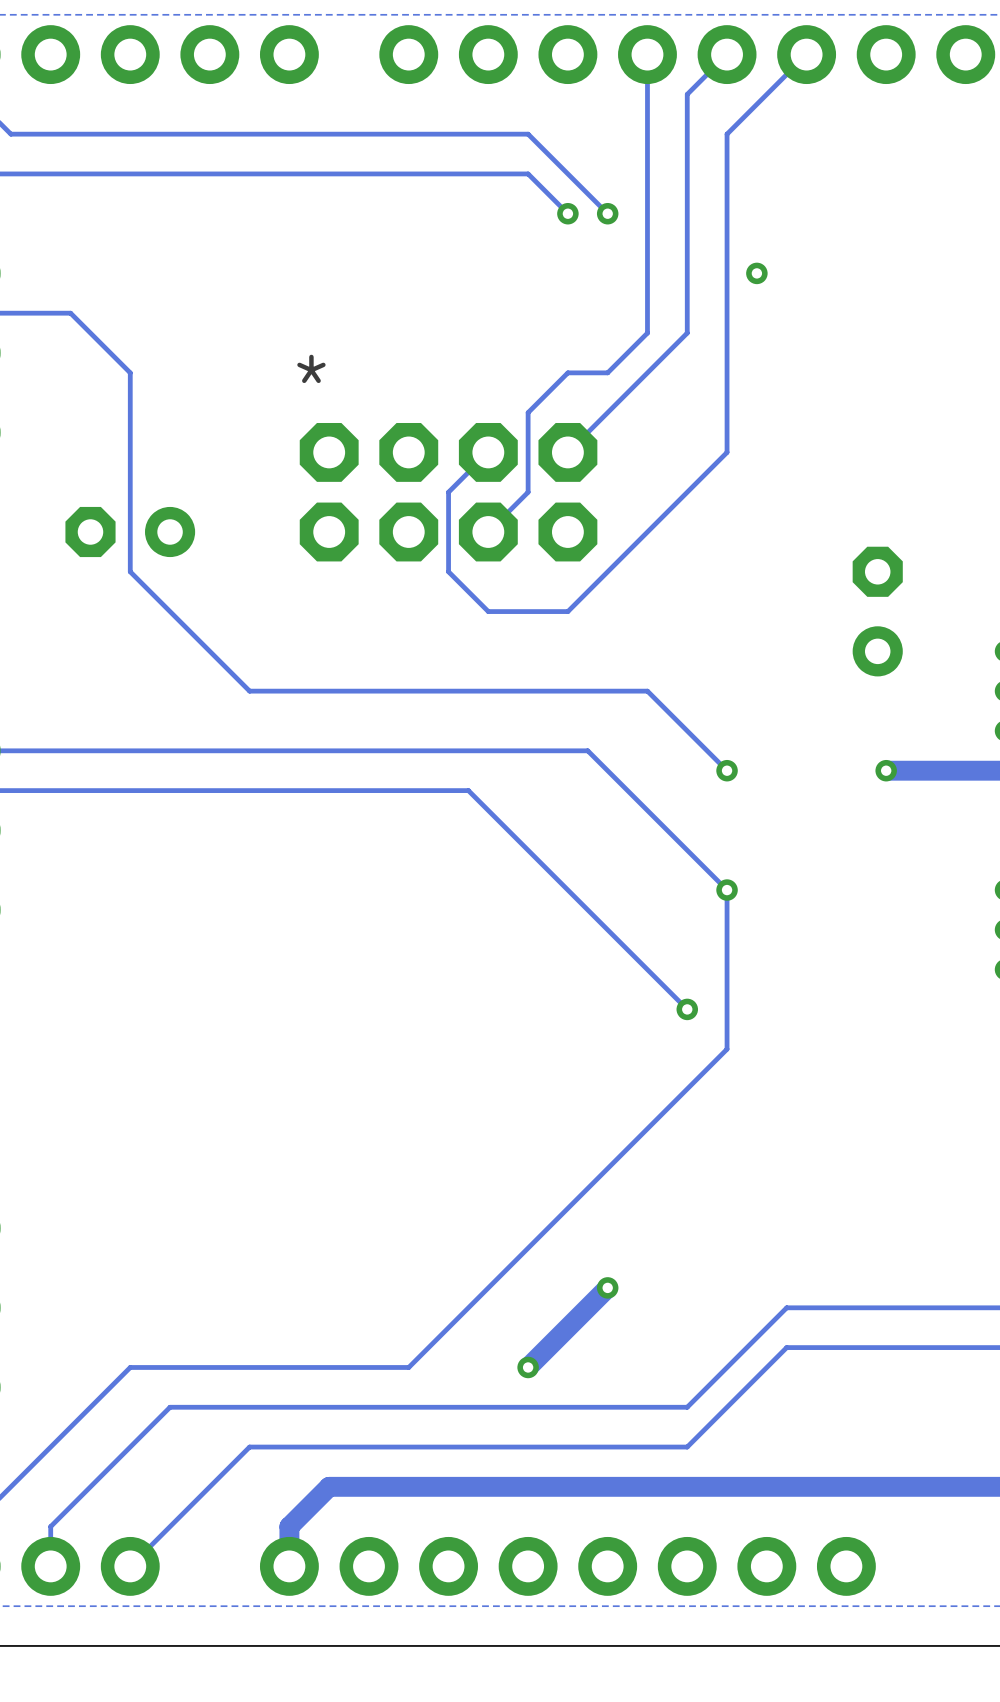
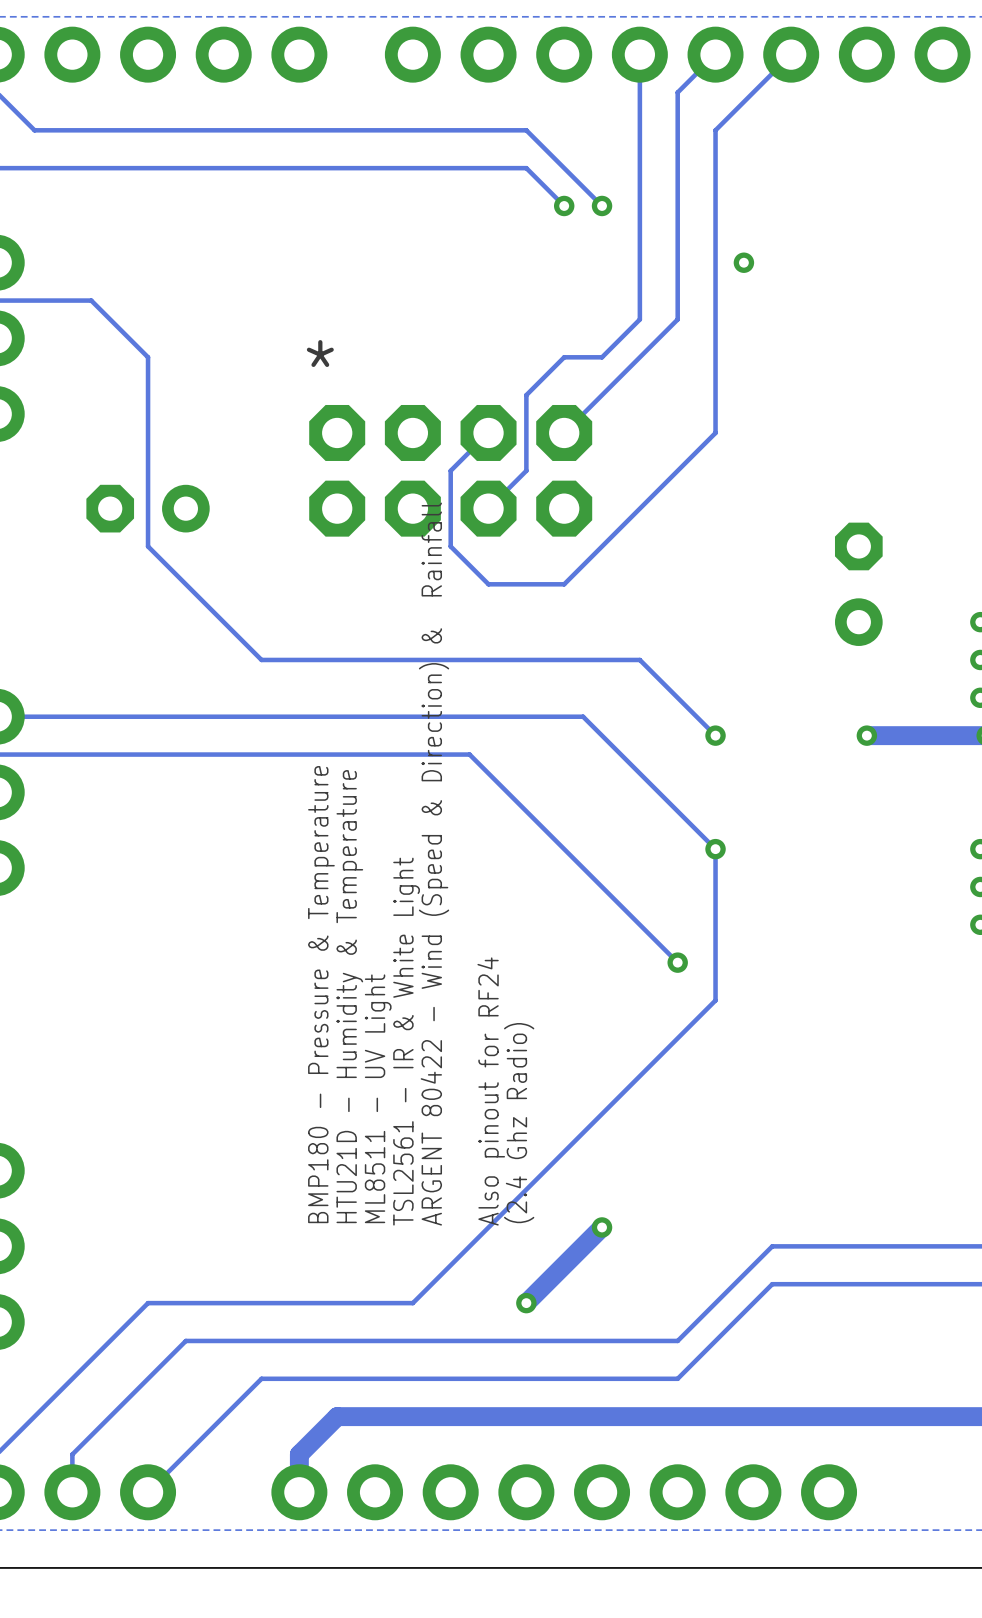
text: none -> ARGENT 80422 - Wind (Speed & Direction) & Rainfall (434, 864)
text: none -> BMP180 - Pressure & Temperature (321, 994)
text: none -> HTU21D - Humidity & Temperature (349, 996)
text: none -> TSL2561 - IR & White Light (406, 1041)
text: none -> Also pinout for RF24 (491, 1091)
text: none -> ML8511 - UV Light (378, 1098)
text: none -> (2.4 Ghz Radio) (519, 1123)

